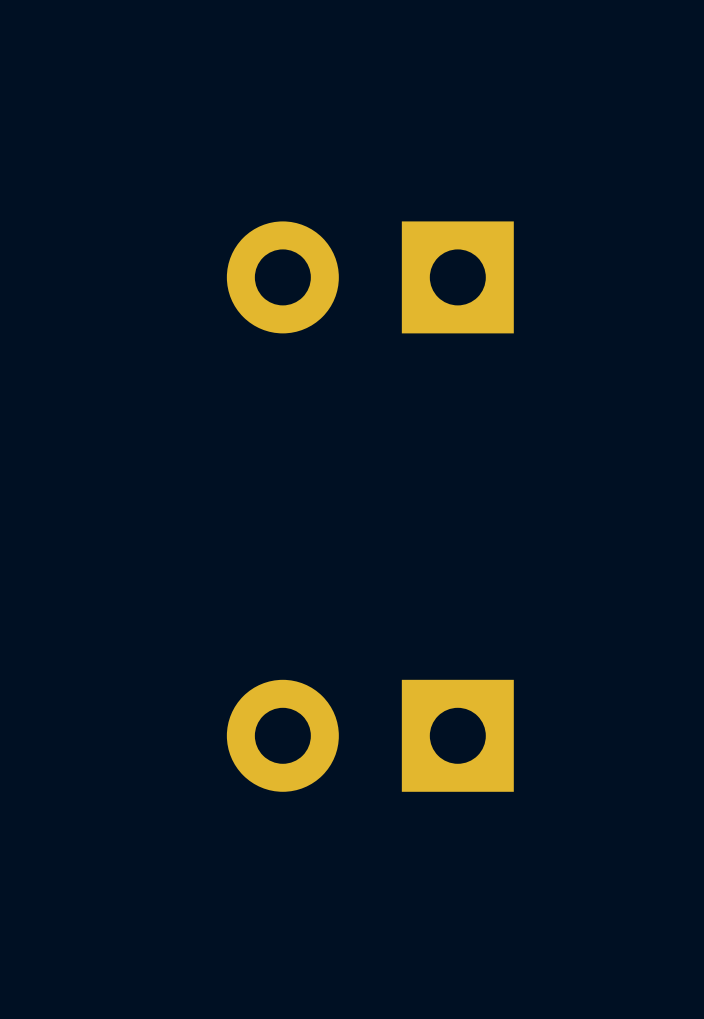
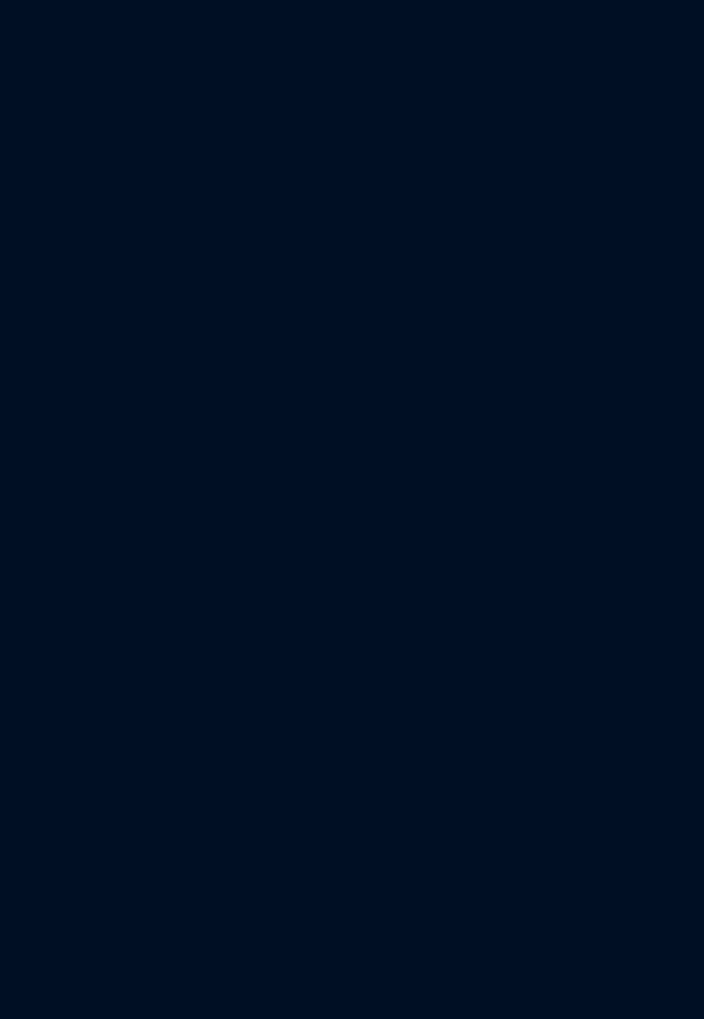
part: (370, 277) -> none
part: (370, 735) -> none

